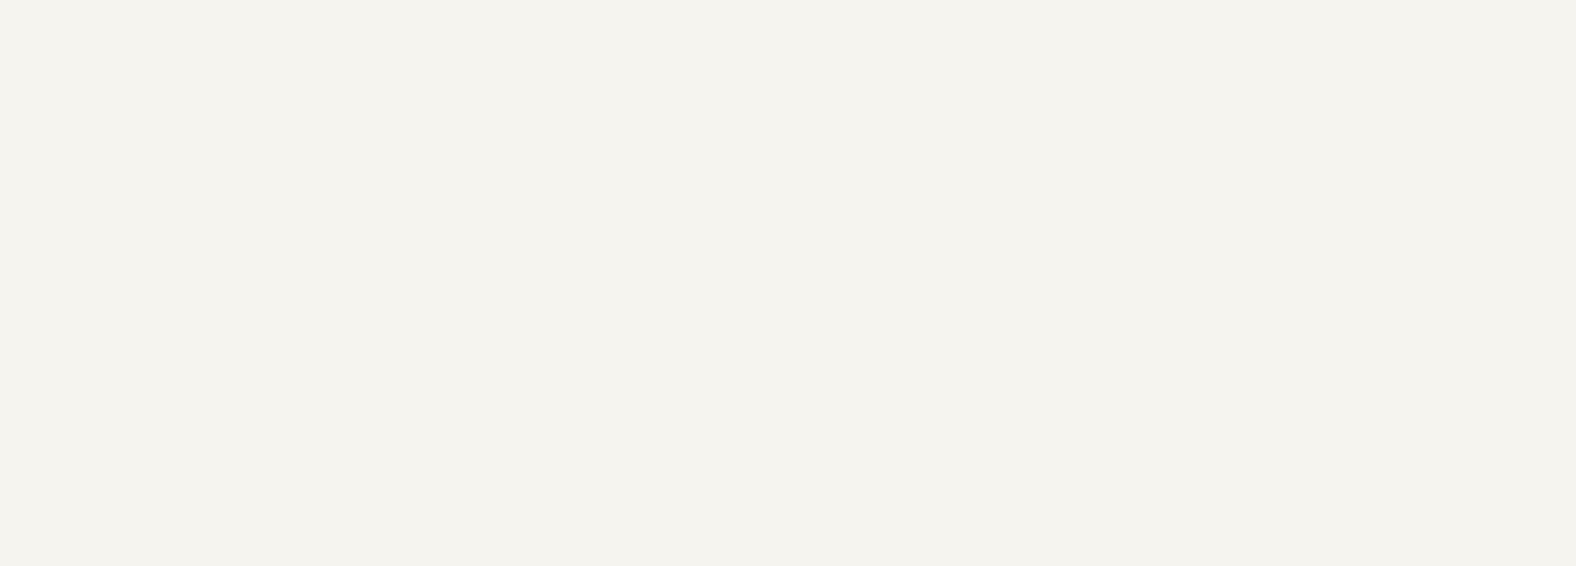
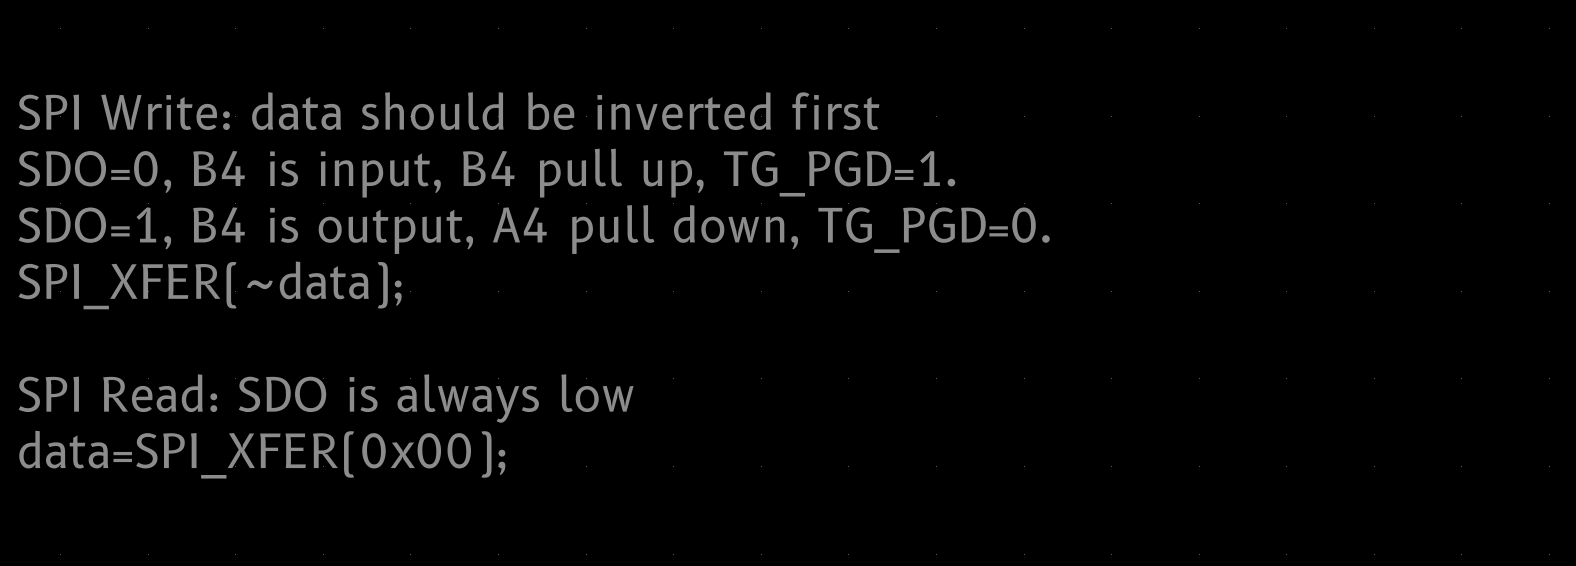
text: none -> SPI Write: data should be inverted first (448, 111)
text: none -> SDO=0, B4 is input, B4 pull up, TG_PGD=1. (486, 173)
text: none -> SDO=1, B4 is output, A4 pull down, TG_PGD=0. (534, 229)
text: none -> SPI_XFER(~data); (210, 285)
text: none -> SPI Read: SDO is always low (326, 398)
text: none -> data=SPI_XFER(0x00); (262, 454)

